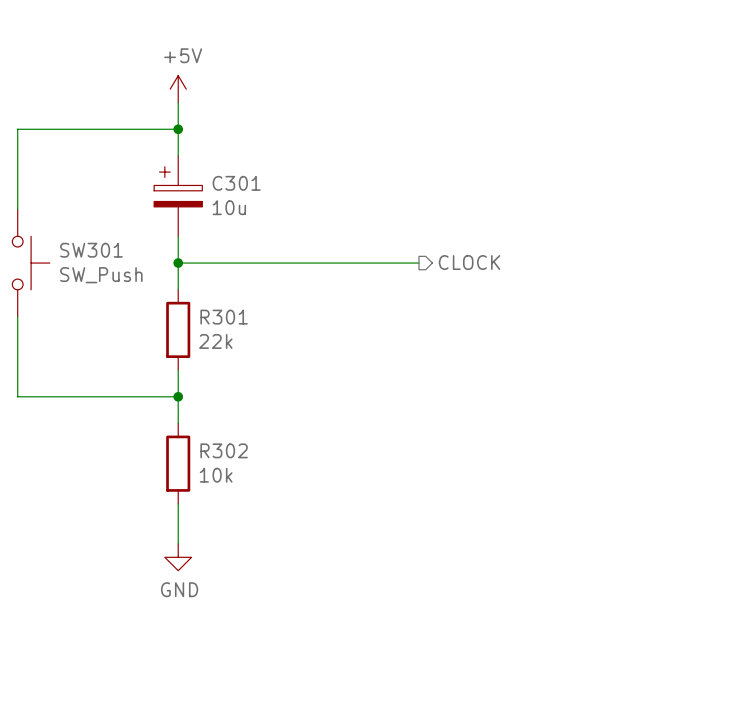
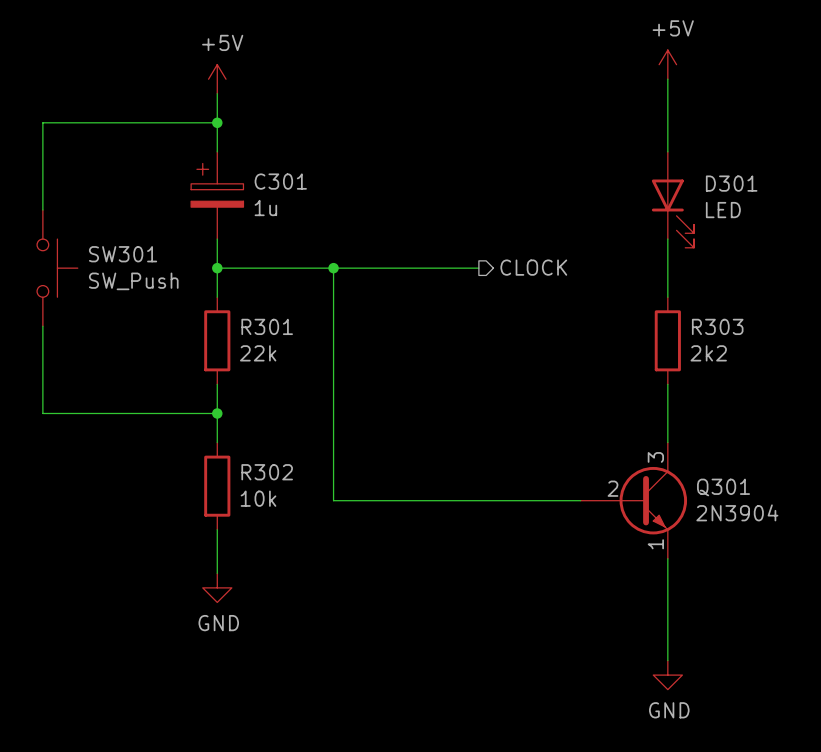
power symbol: none -> +5V (667, 64)
wire: none -> (667, 79) (667, 151)
D301: none -> LED (672, 199)
C301 value: 10u (229, 207) -> 1u (265, 208)
wire: none -> (667, 239) (667, 297)
wire: none -> (333, 268) (333, 500) (580, 500)
junction: none -> (333, 268)
R303: none -> 2k2 (667, 340)
wire: none -> (667, 384) (667, 442)
Q301: none -> 2N3904 (633, 500)
wire: none -> (667, 558) (667, 660)
power symbol: none -> GND (667, 675)

